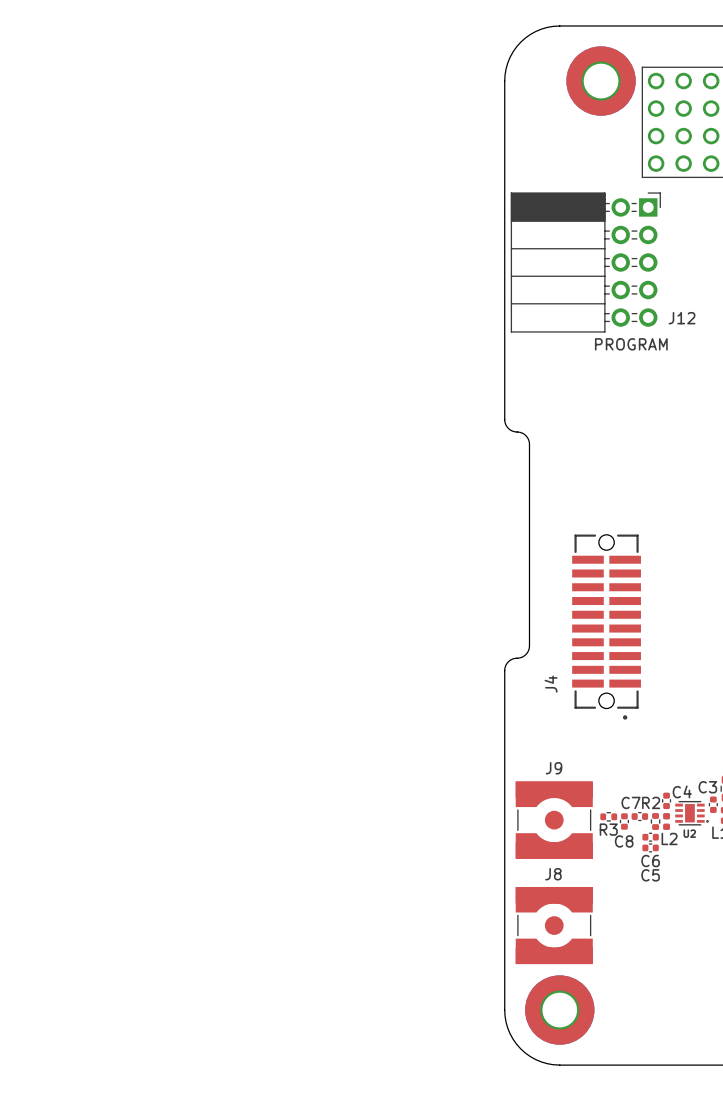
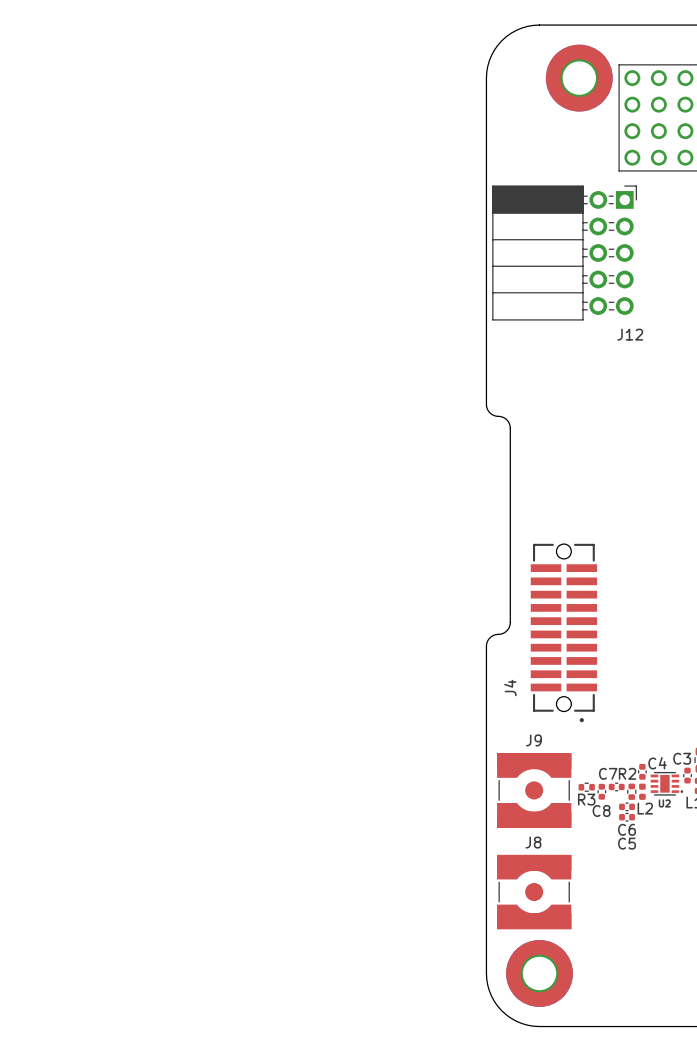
J12 name position: J12 (682, 318) -> J12 (630, 334)
text: PROGRAM (631, 344) -> none
J4 position: (606, 627) -> (563, 633)

